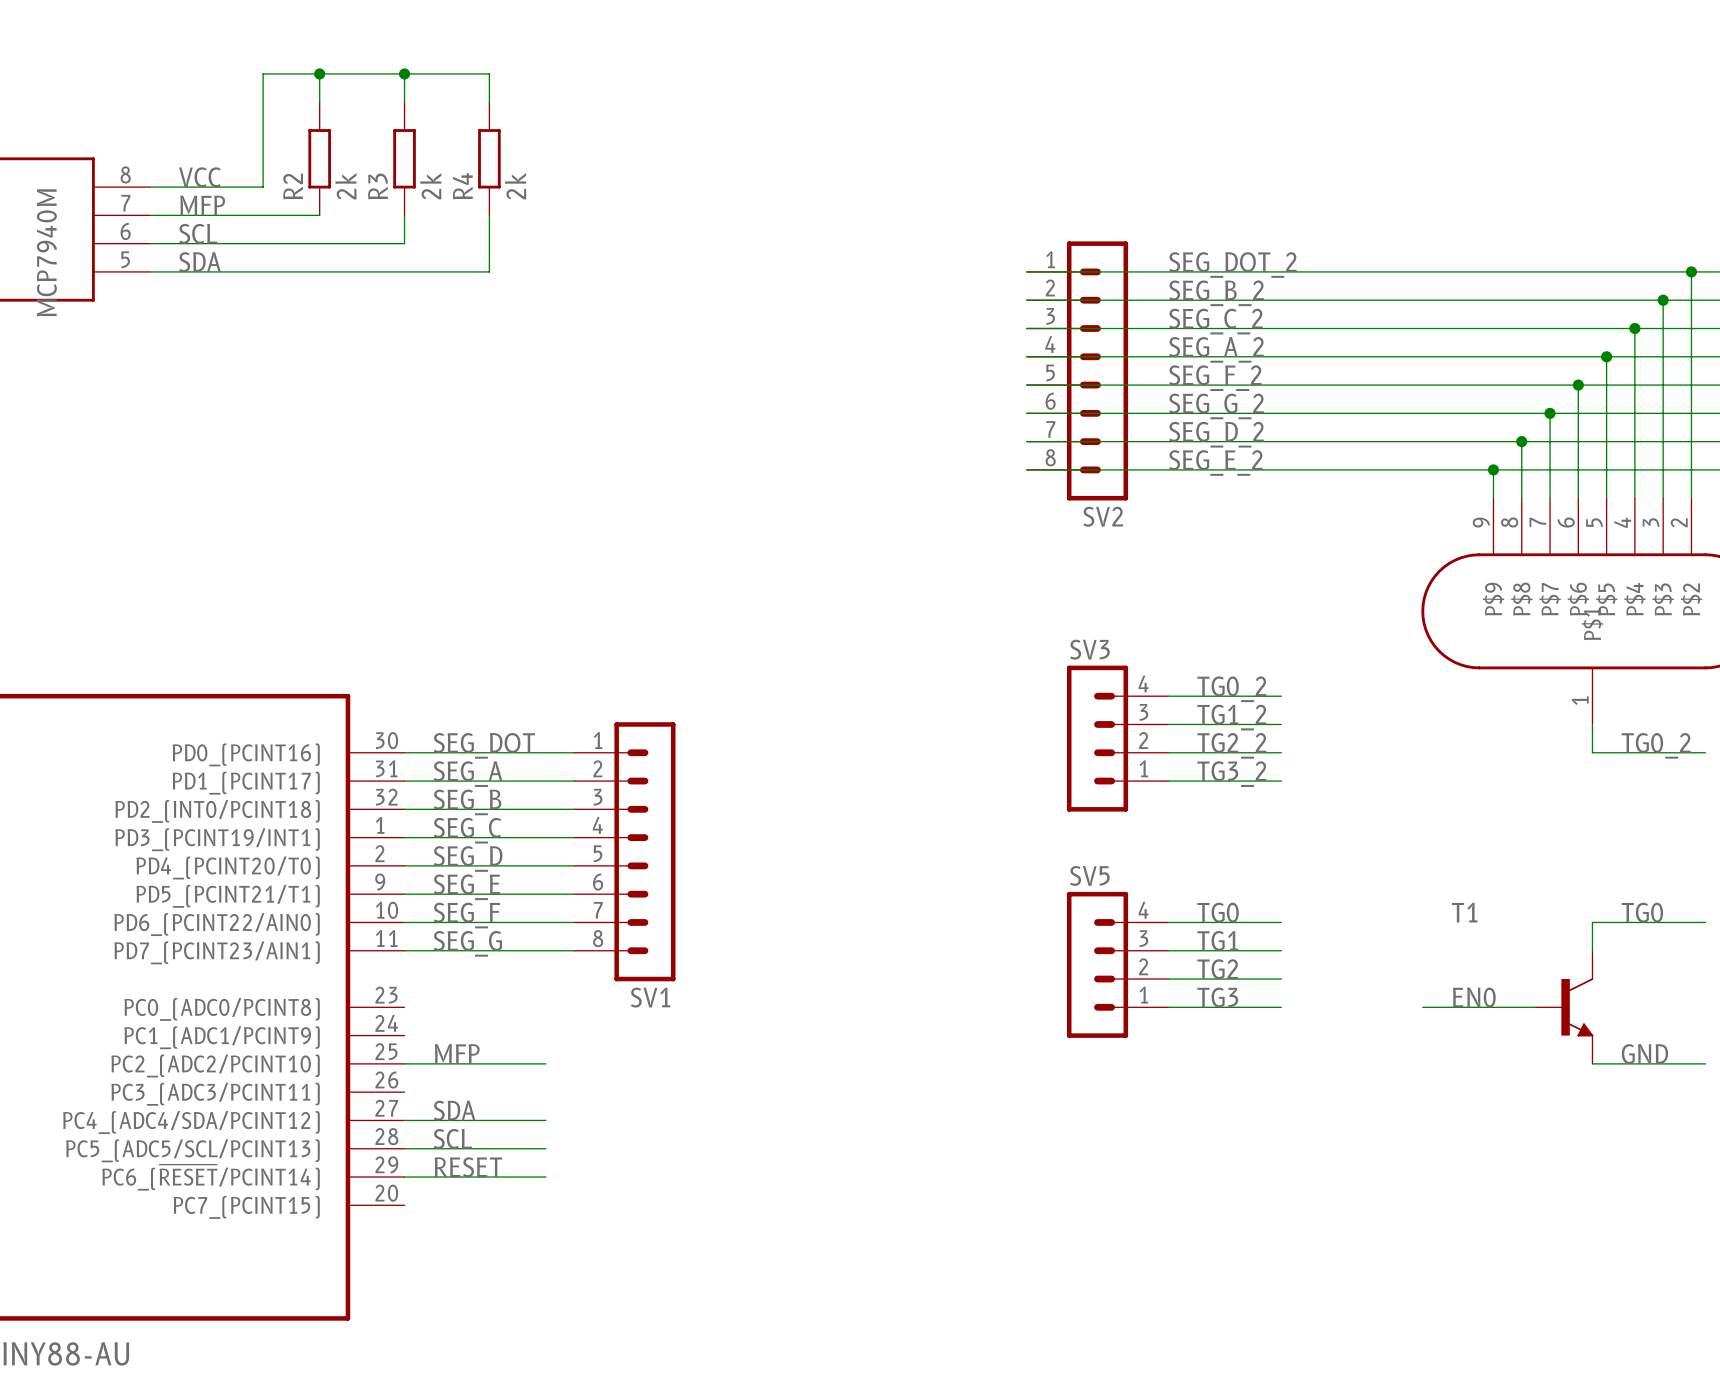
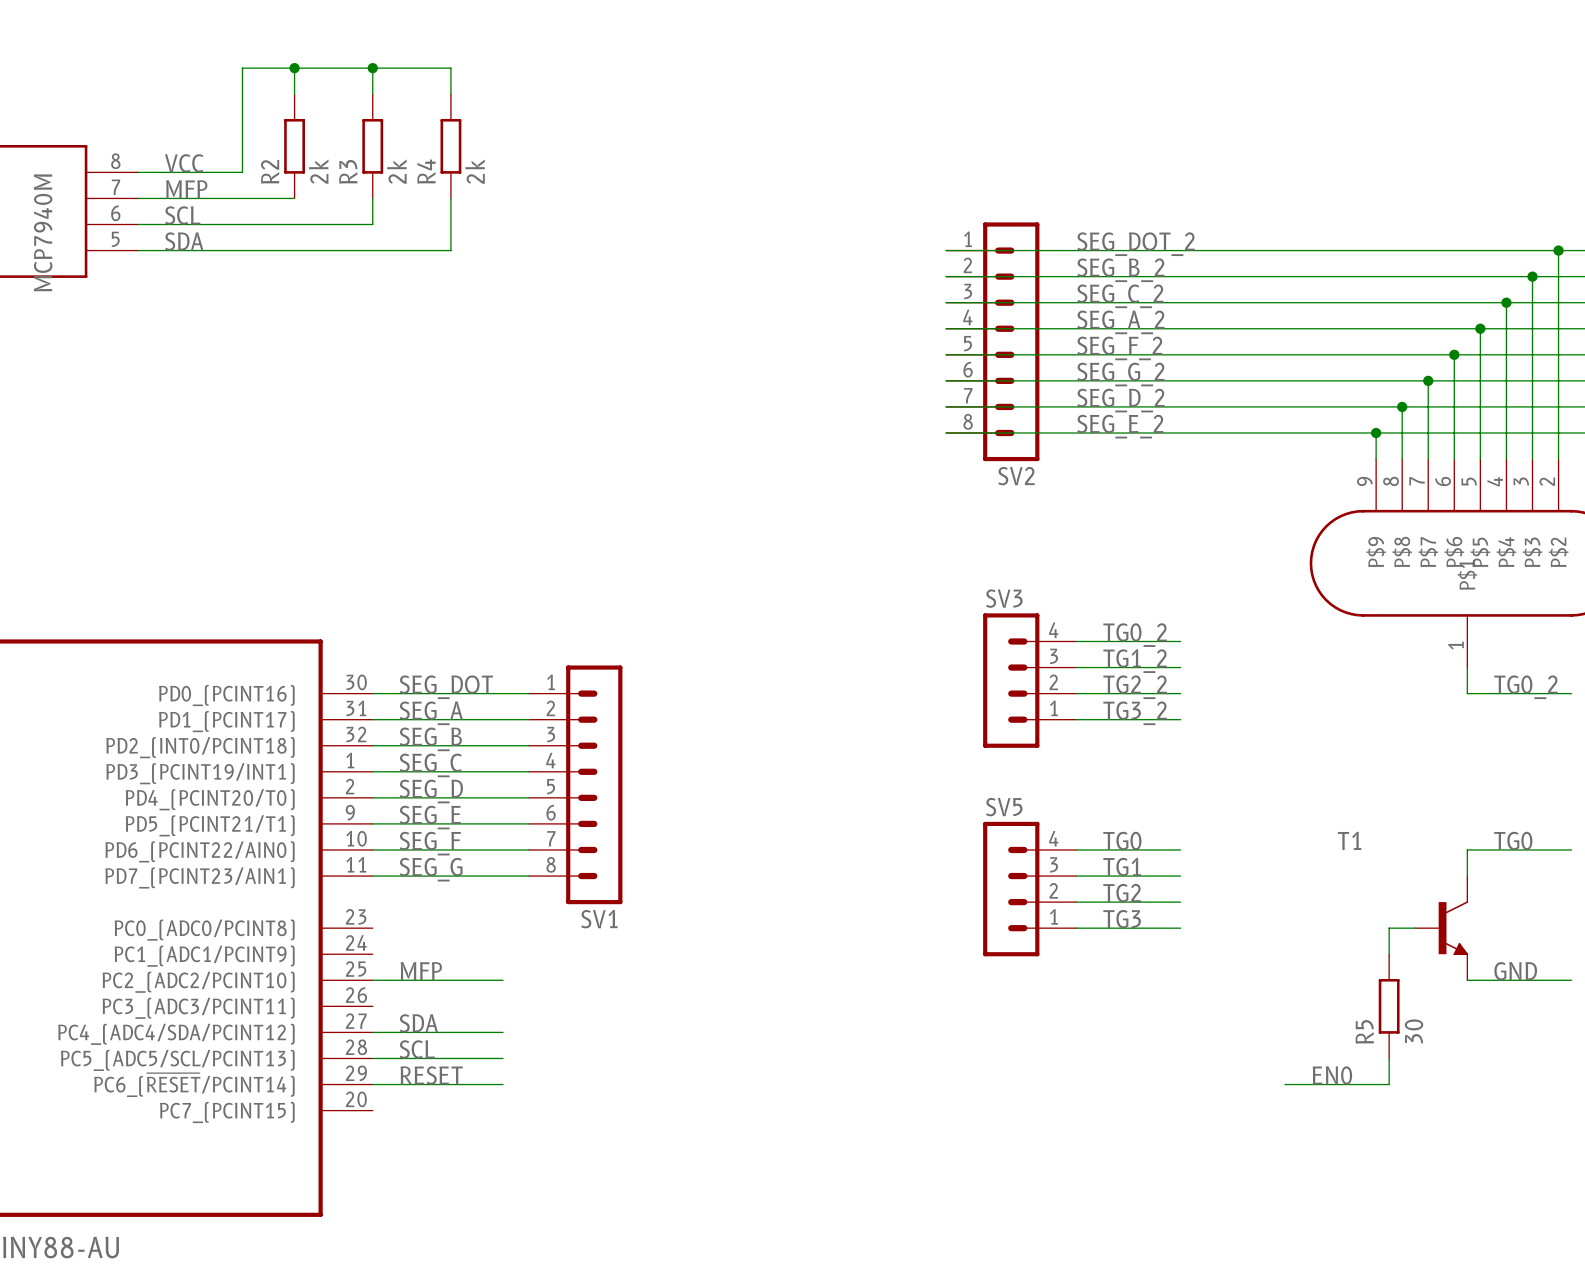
label position: EN0 (1474, 997) -> EN0 (1332, 1075)
wire: (1422, 1007) (1507, 1007) -> (1389, 954) (1389, 928)
R5: none -> 30 (1389, 1006)
wire: none -> (1389, 1058) (1389, 1084) (1284, 1084)

